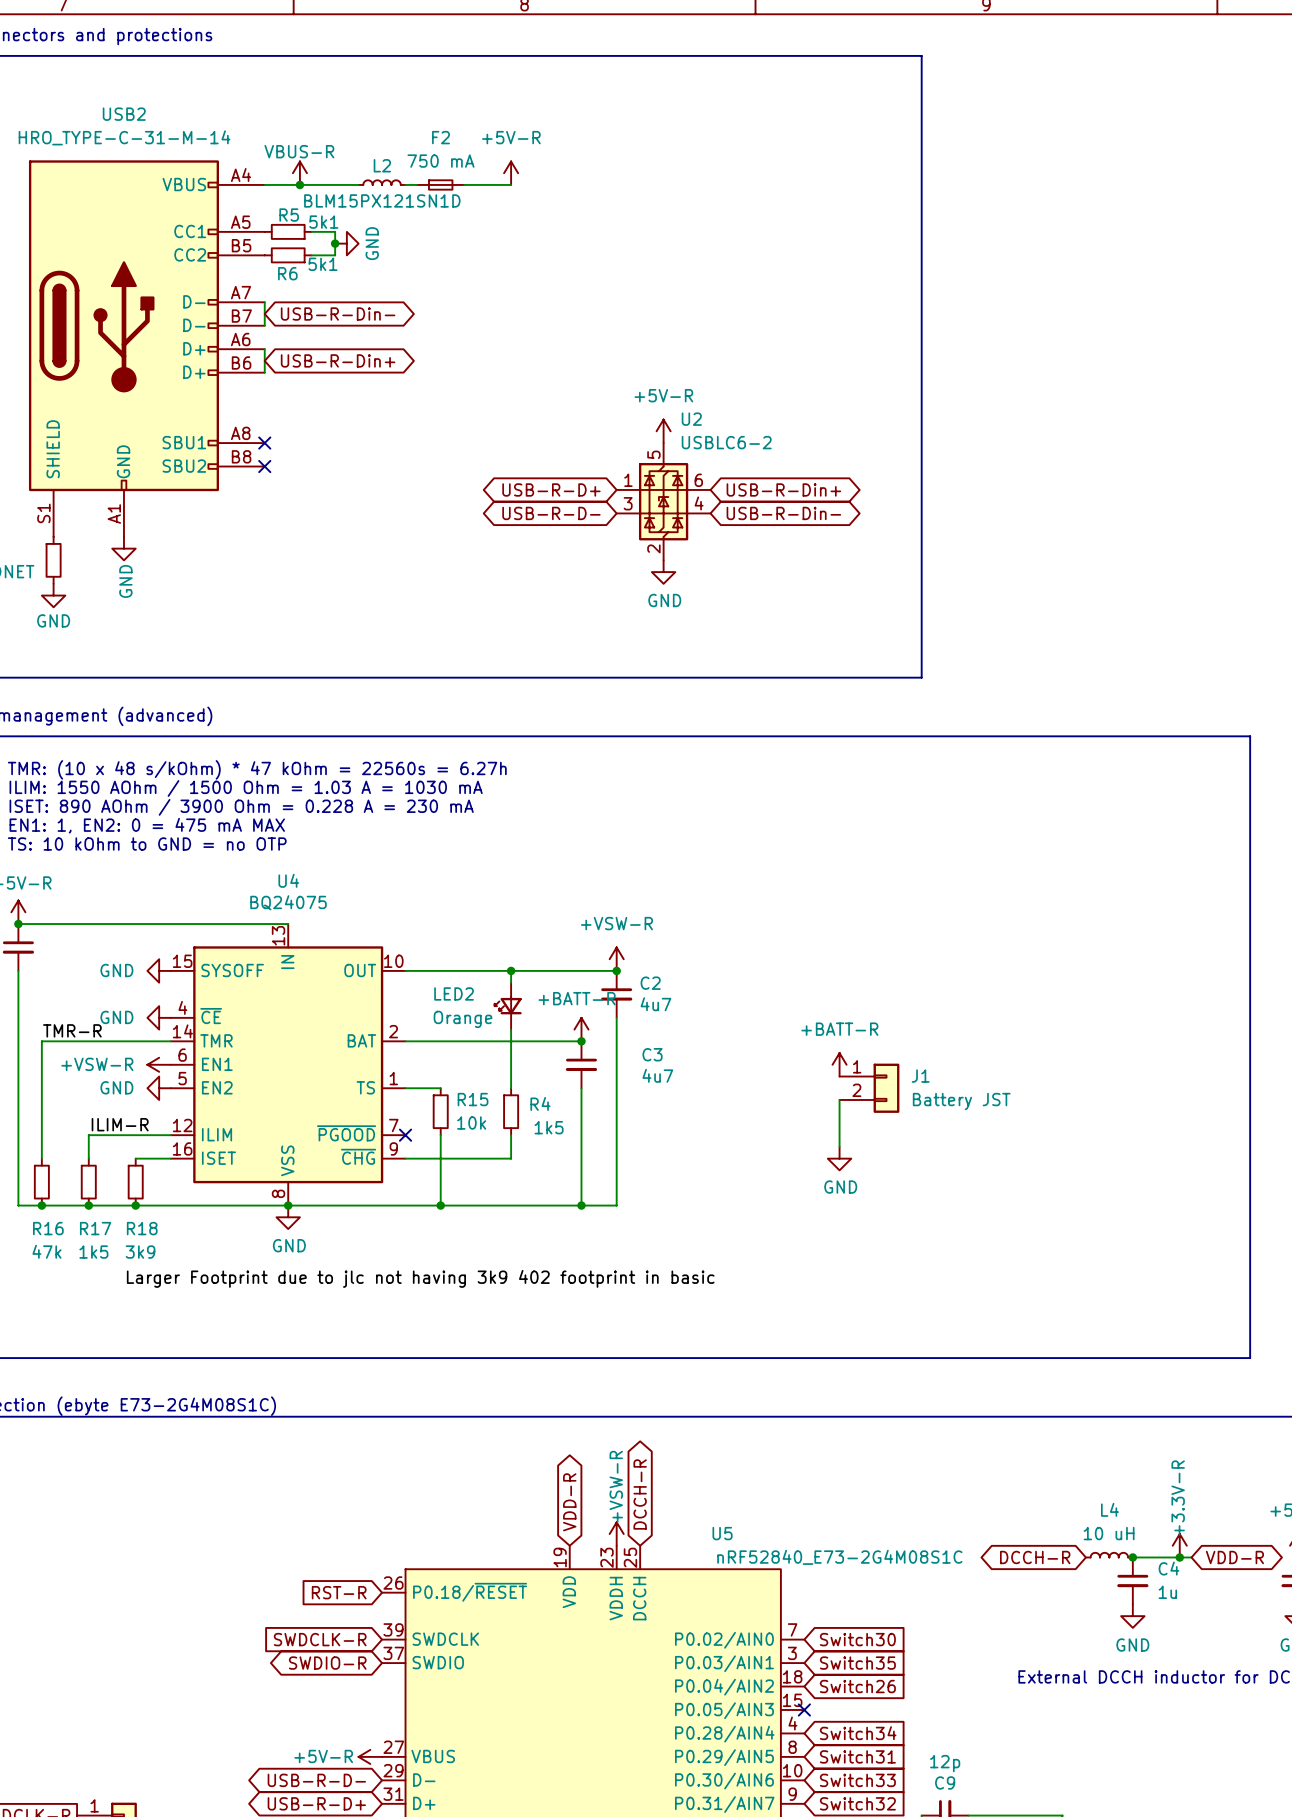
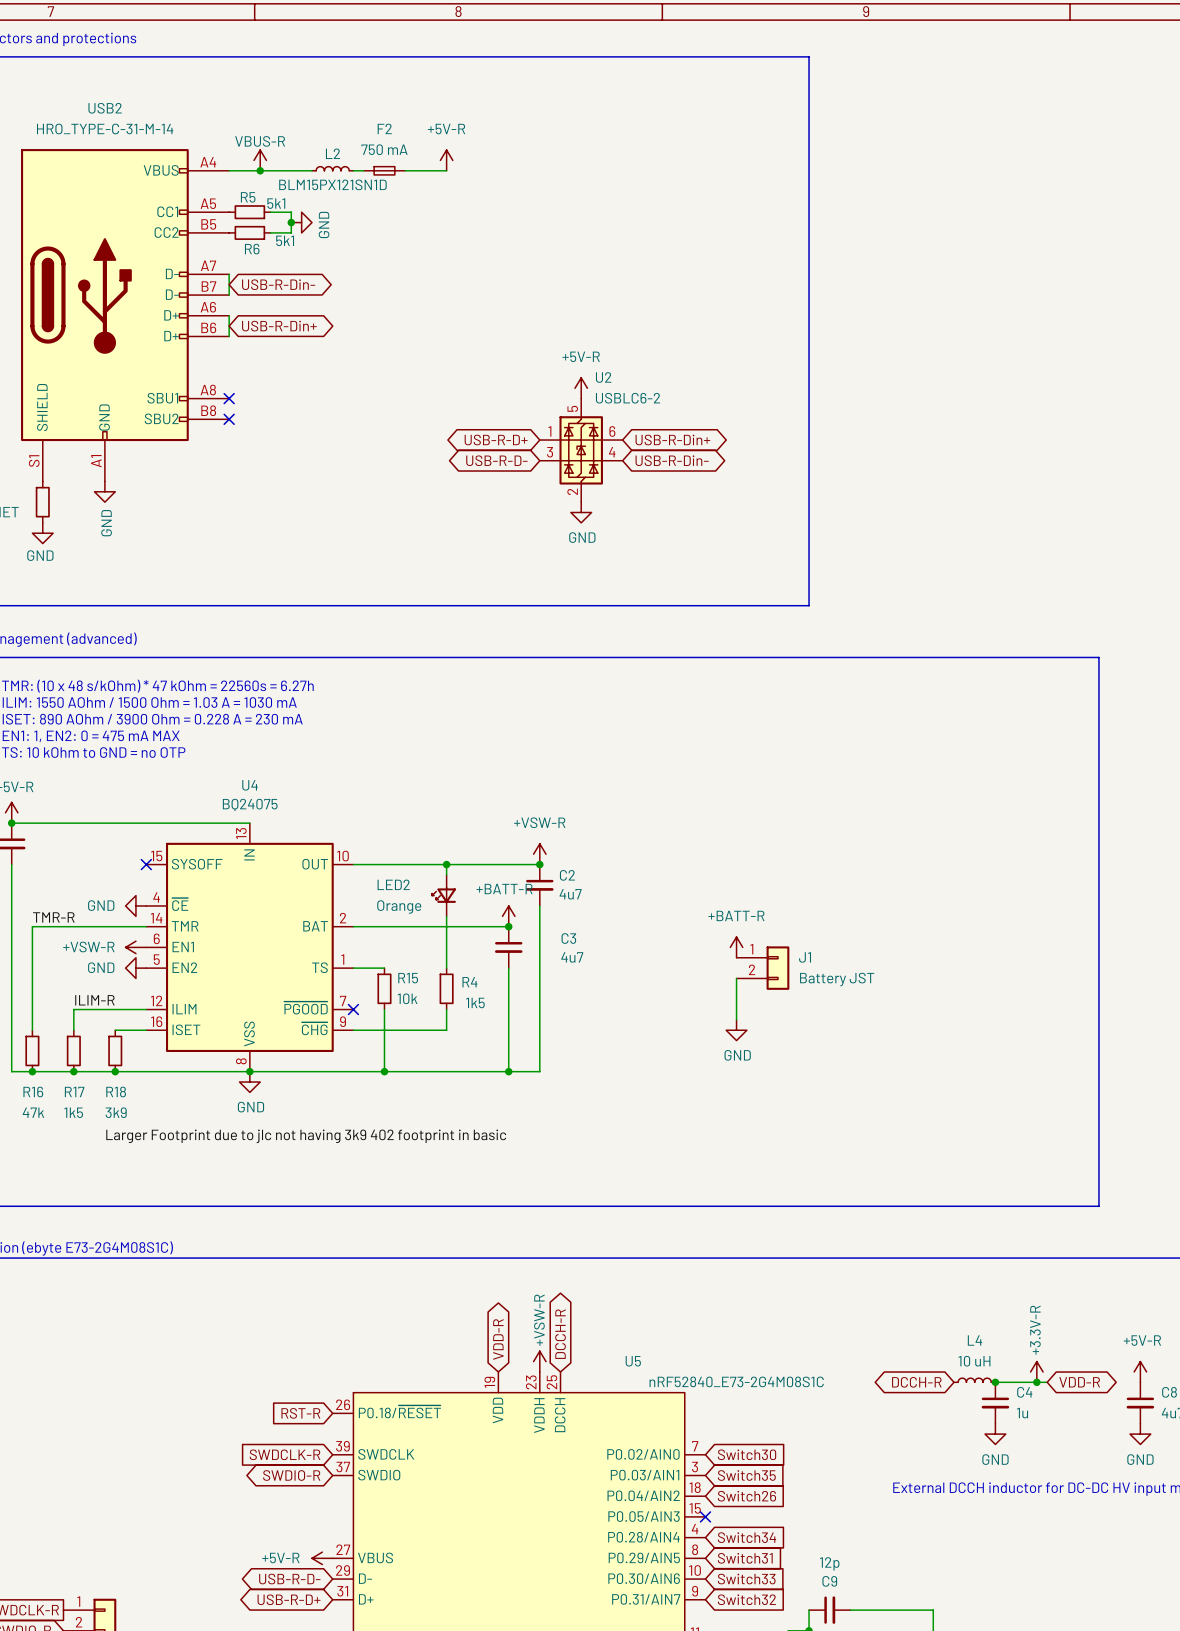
power symbol: GND (159, 970) -> none
no-connect mark: none -> (146, 864)

